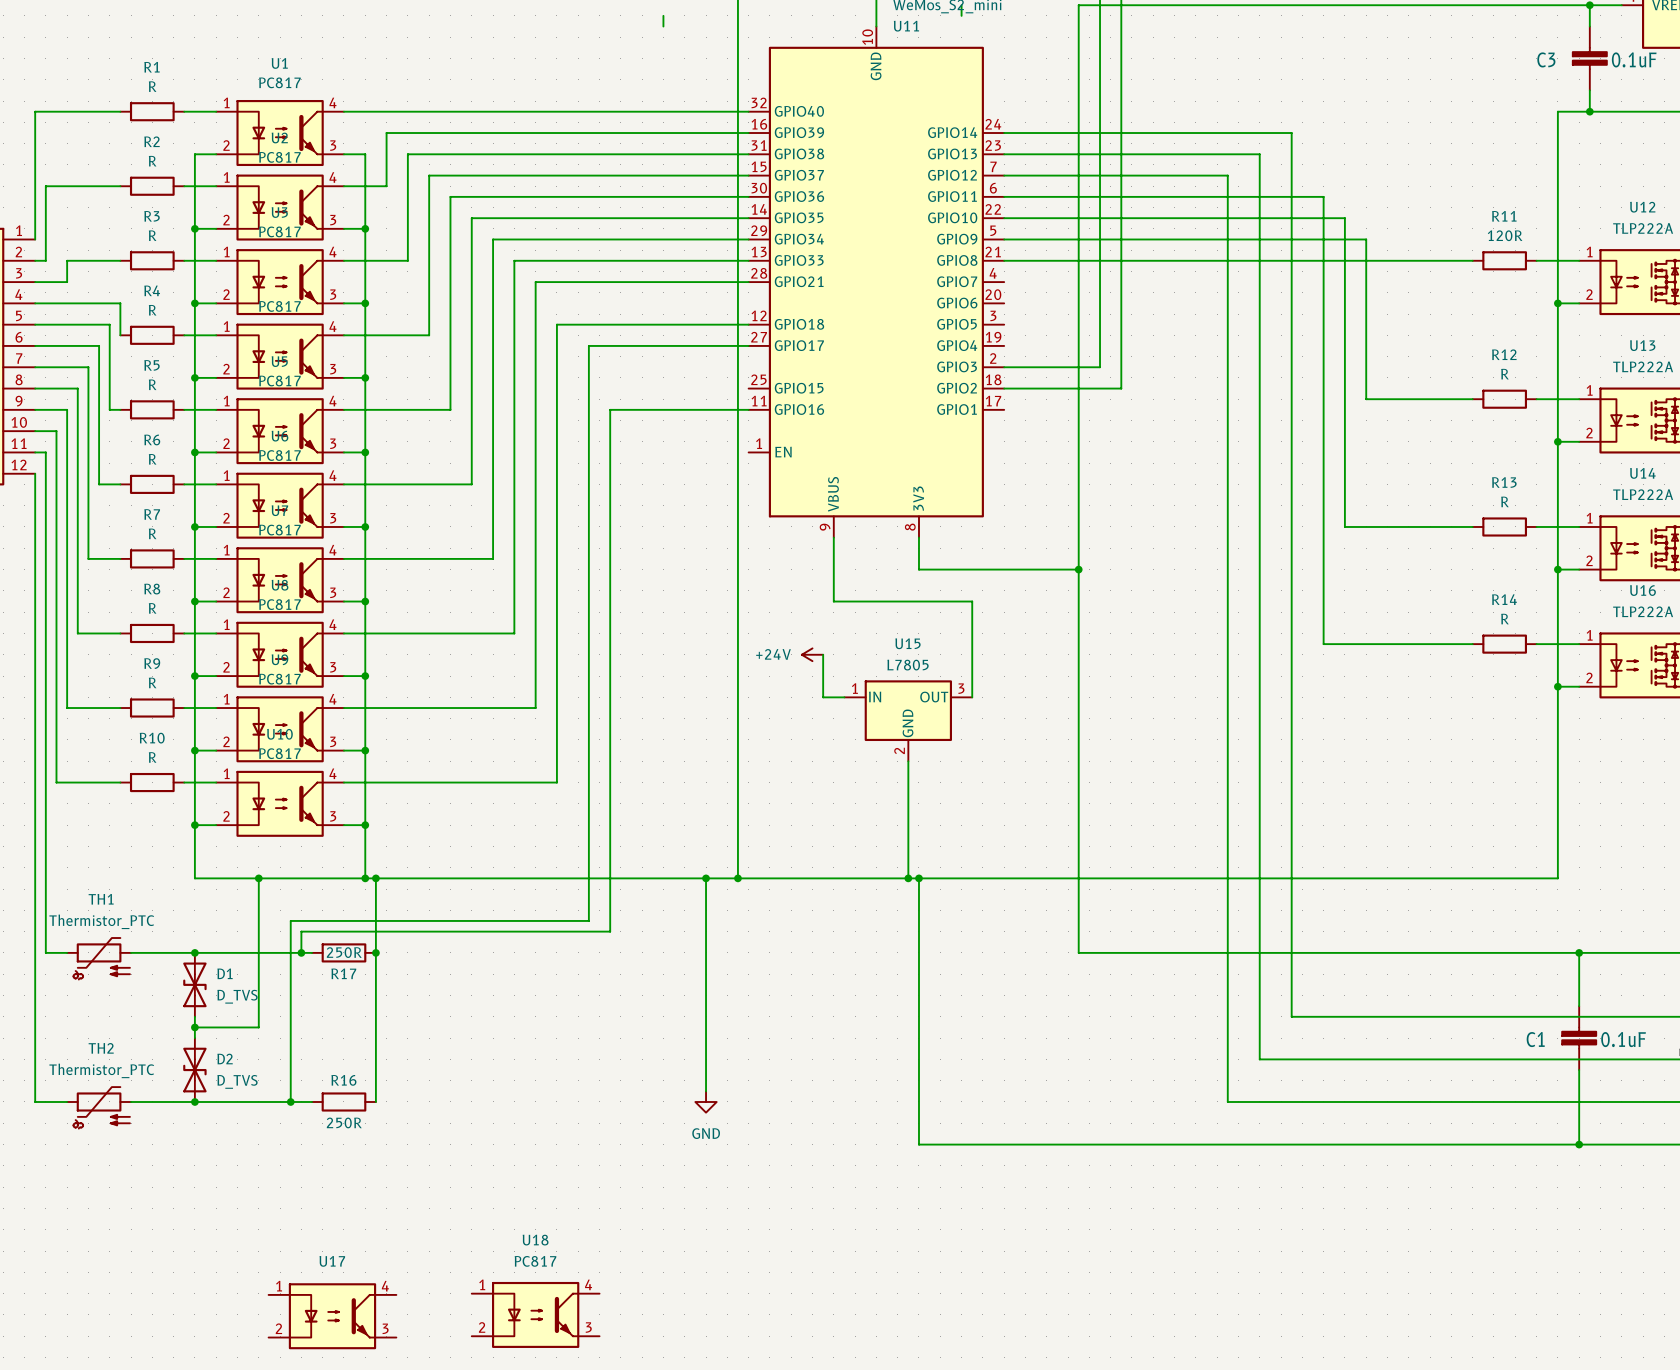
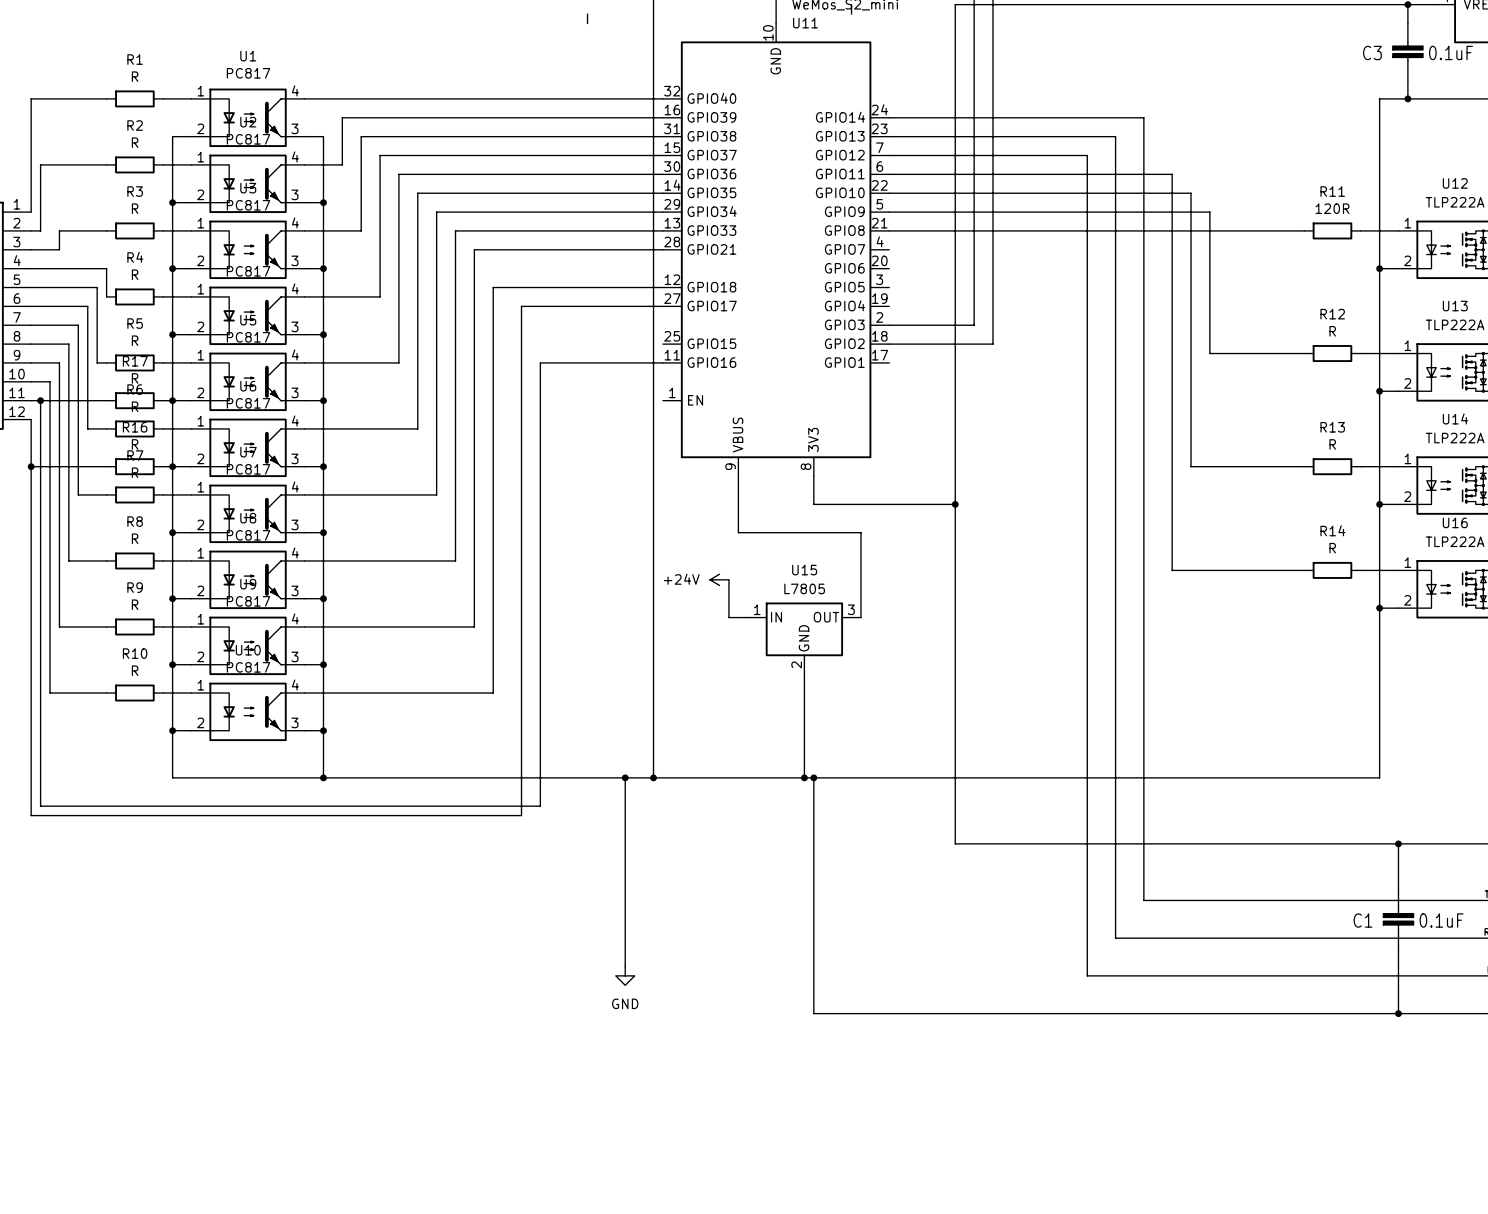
wire: none -> (40, 400) (106, 400)
junction: none -> (40, 400)
wire: none -> (163, 400) (172, 400)
wire: none -> (31, 466) (106, 466)
junction: none -> (31, 466)
wire: none -> (163, 466) (172, 466)
wire: (258, 878) (258, 1027) (194, 1027) -> none
junction: (258, 878) -> none
wire: (375, 878) (375, 1101) -> none
junction: (375, 878) -> none
wire: (45, 910) (45, 952) (67, 952) -> none
wire: (610, 910) (610, 931) (301, 931) (301, 952) -> (540, 806) (40, 806)
wire: (35, 920) (35, 1101) (67, 1101) -> (31, 815) (257, 815)
wire: (290, 920) (290, 1101) -> none
wire: (131, 952) (312, 952) -> none
junction: (194, 952) -> none
junction: (301, 952) -> none
R17 position: (343, 952) -> (134, 400)
R17 value: 250R (344, 952) -> R (135, 378)
junction: (375, 952) -> none
TH1: Thermistor_PTC (99, 958) -> none
R17 name position: R17 (343, 973) -> R17 (135, 361)
D1: D_TVS (194, 984) -> none
wire: (194, 1016) (194, 1038) -> none
junction: (194, 1027) -> none
D2: D_TVS (194, 1070) -> none
R16 name position: R16 (343, 1080) -> R16 (135, 427)
wire: (131, 1101) (312, 1101) -> none
junction: (194, 1101) -> none
junction: (290, 1101) -> none
R16 position: (343, 1101) -> (134, 466)
TH2: Thermistor_PTC (99, 1107) -> none
R16 value: 250R (344, 1122) -> R (135, 444)
U18: PC817 (535, 1314) -> none
U17: (332, 1316) -> none

